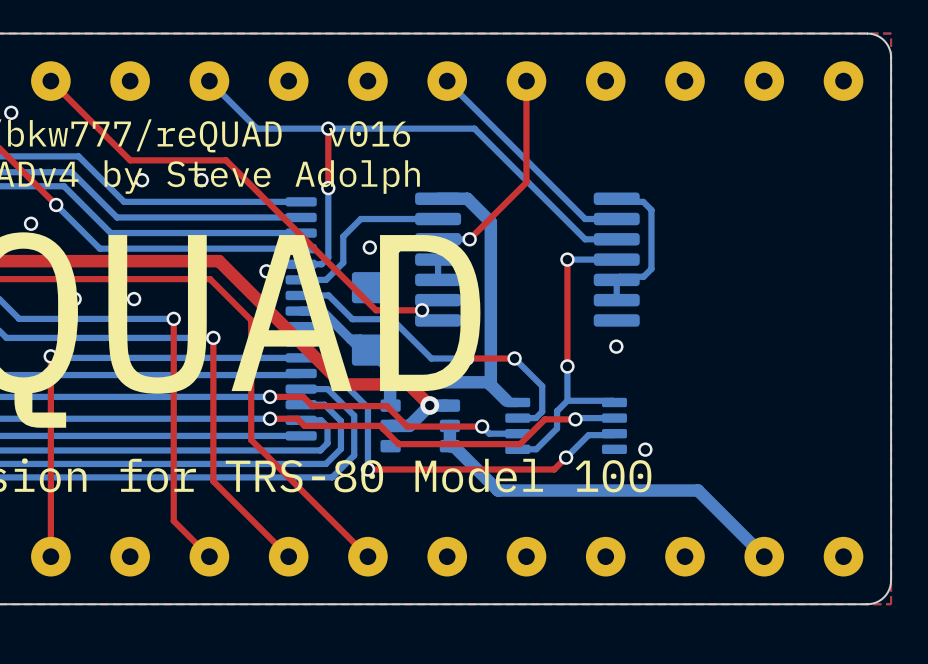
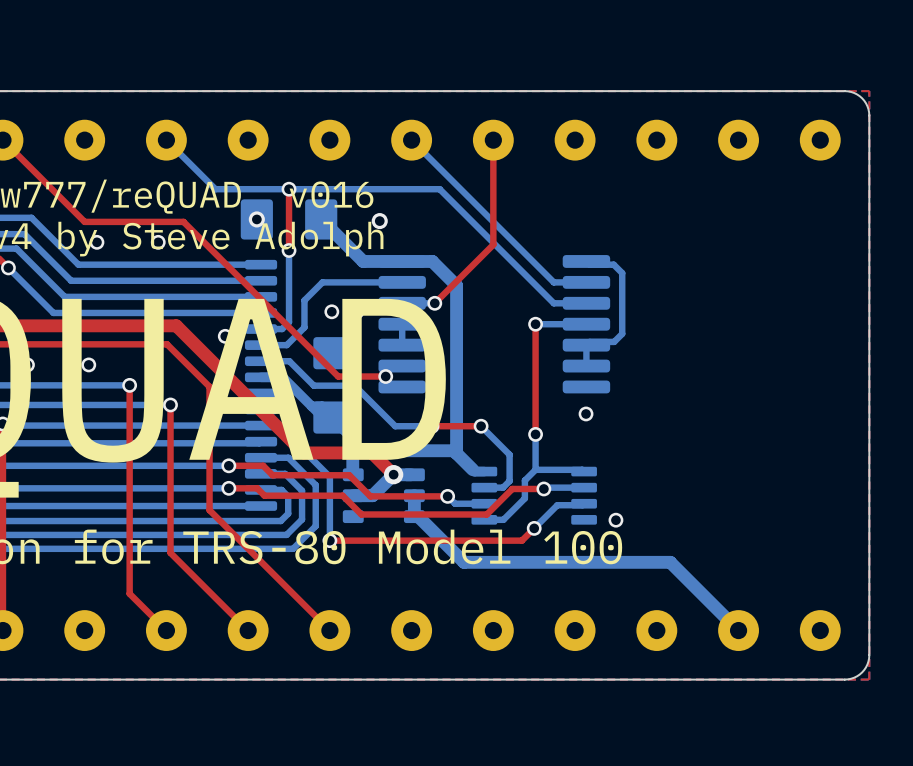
via: none -> (256, 219)
part: none -> (289, 219)
bottom track: none -> (321, 219) (363, 261) (402, 261)
via: none -> (379, 221)

